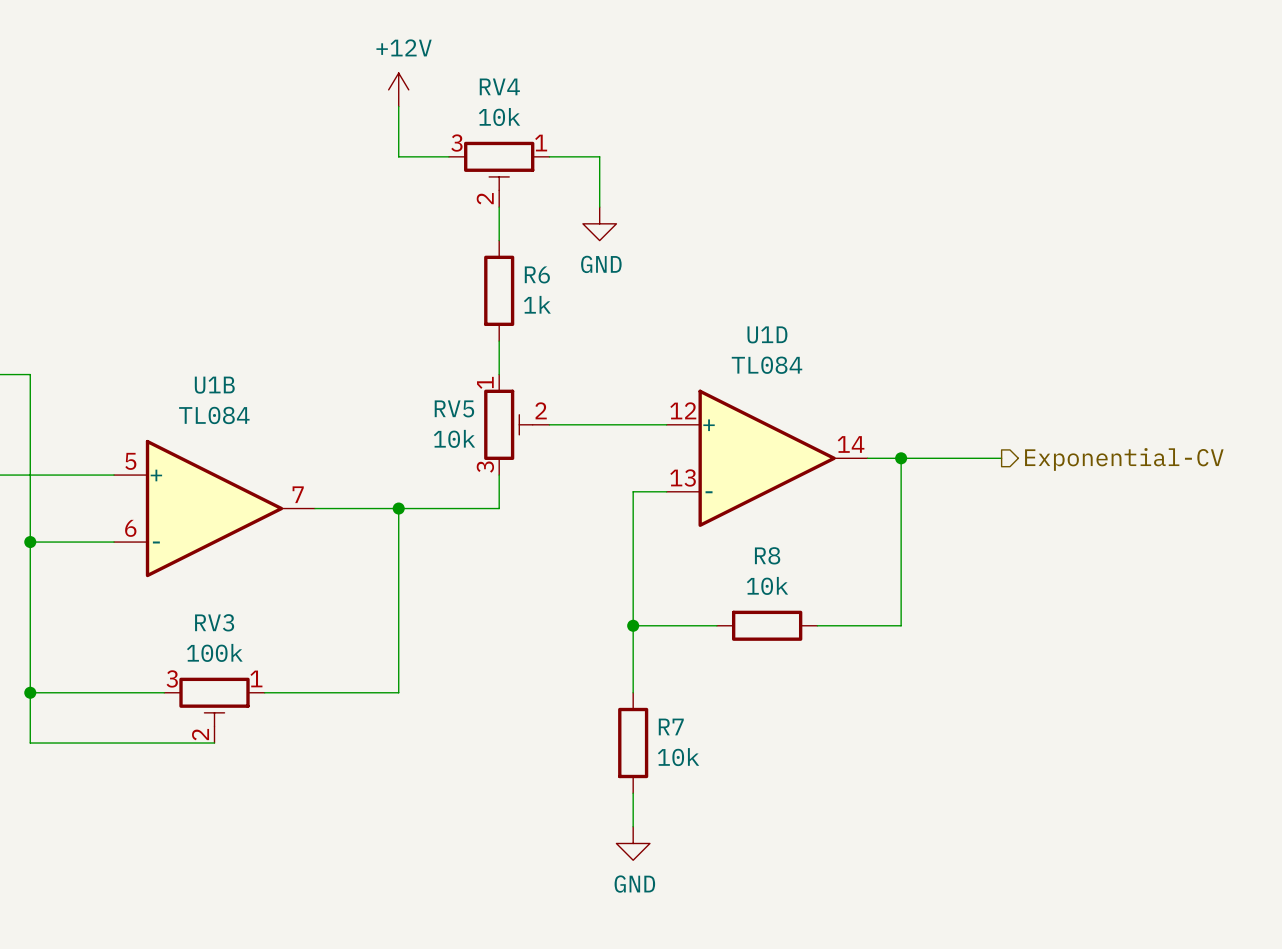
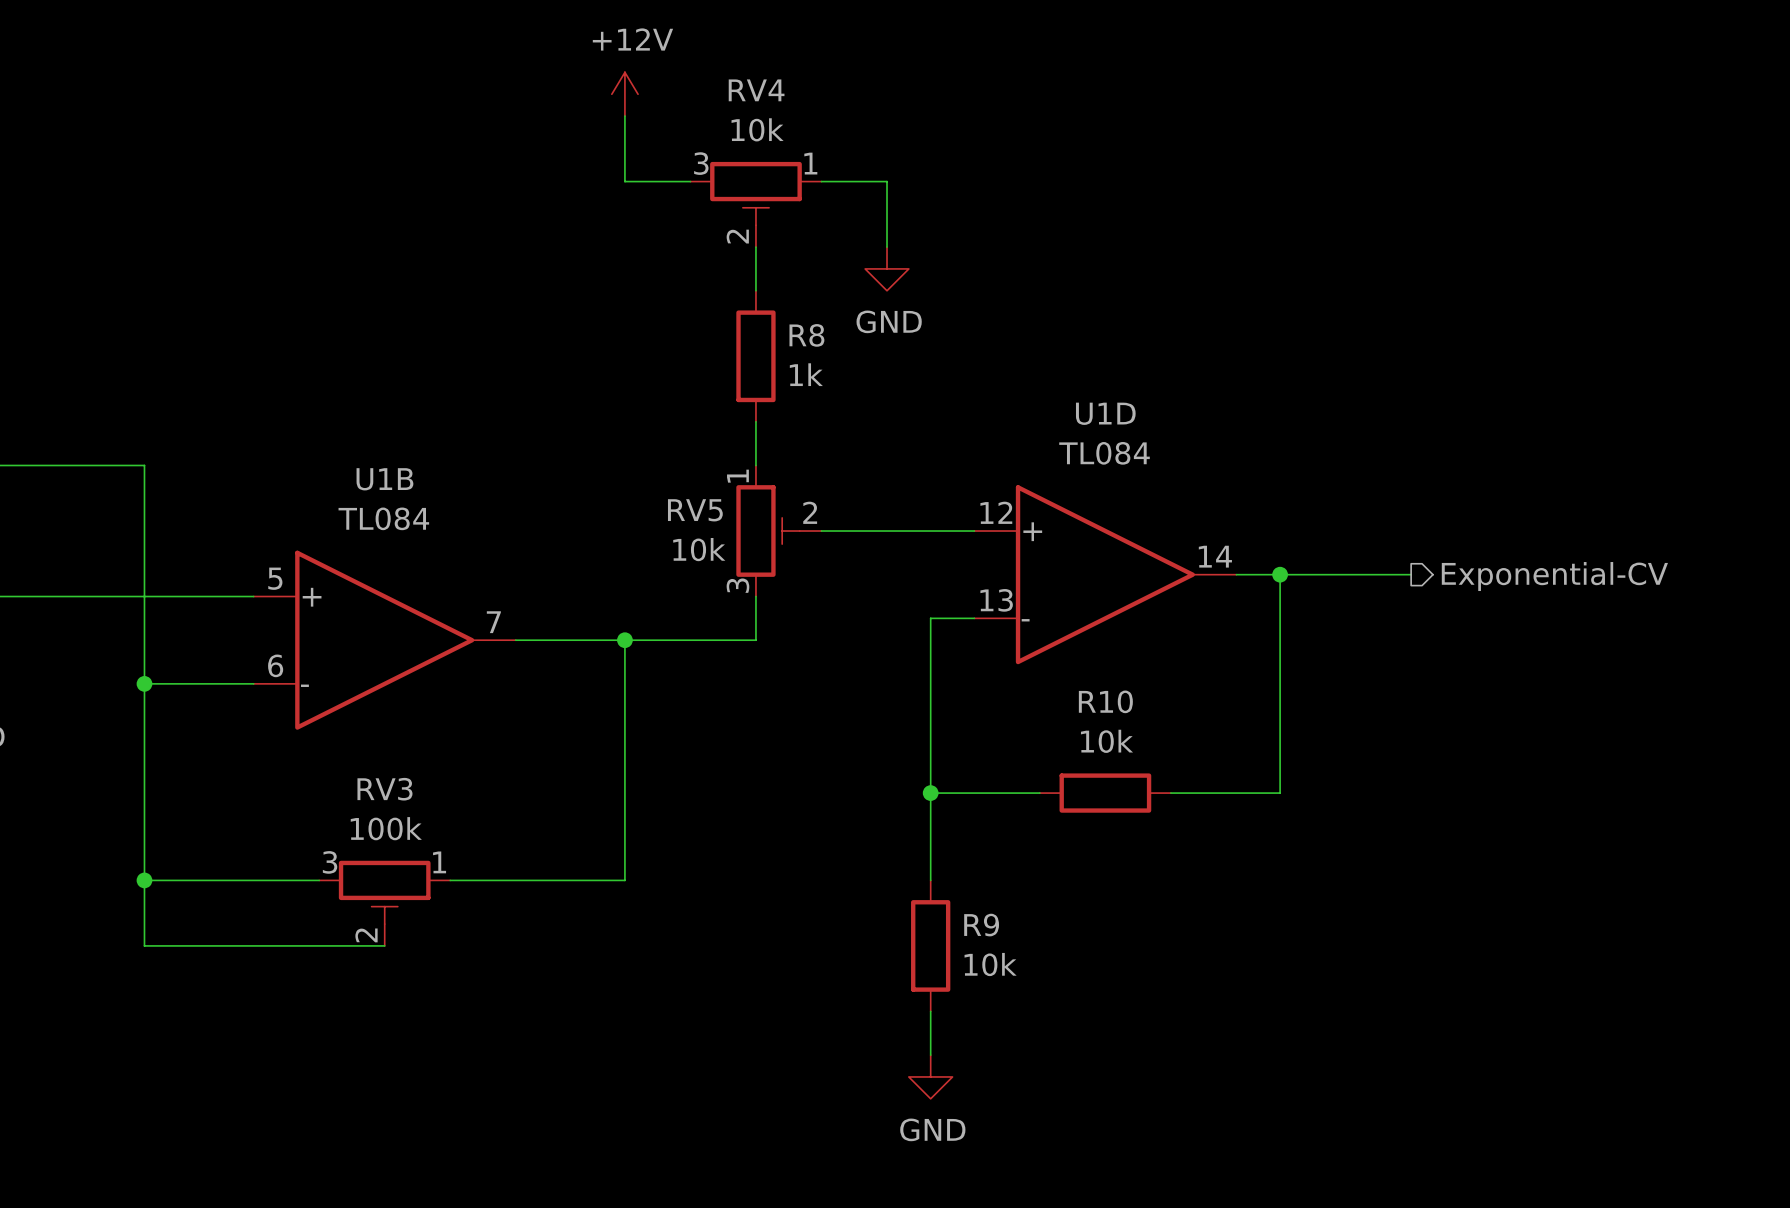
R6 name: R6 (537, 274) -> R8 (806, 335)
R8 name: R8 (767, 555) -> R10 (1105, 701)
R7 name: R7 (671, 726) -> R9 (981, 925)

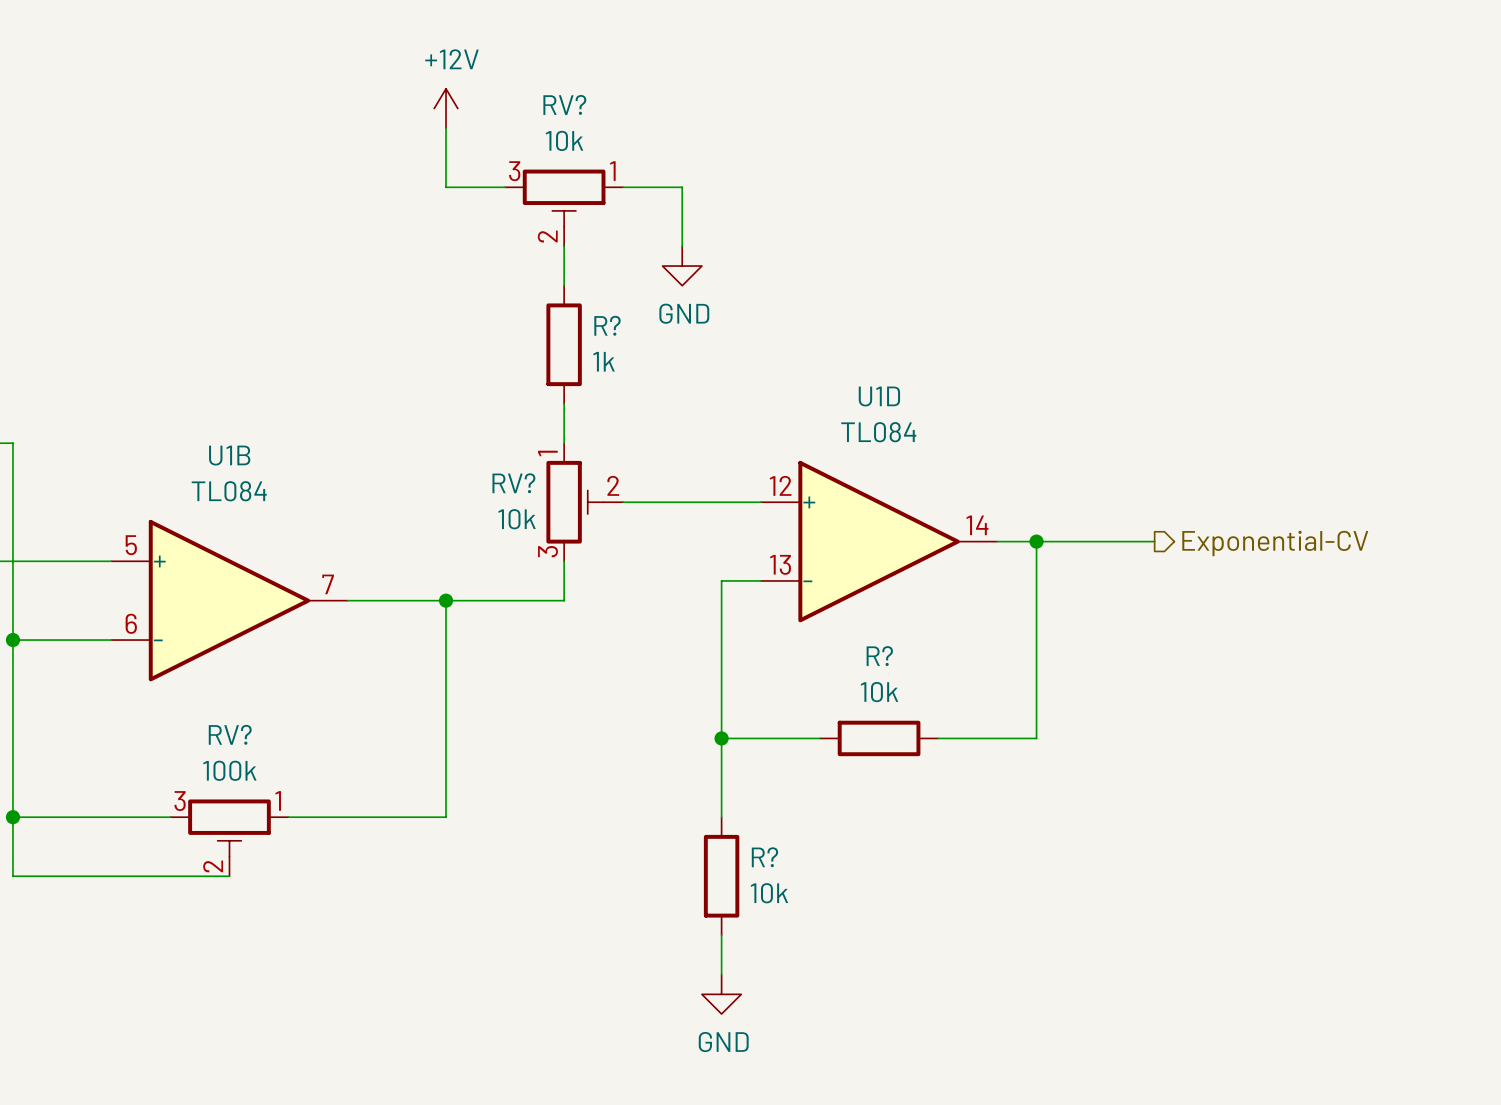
RV4 name: RV4 (756, 90) -> RV? (564, 104)
R8 name: R8 (806, 335) -> R? (607, 325)
RV5 name: RV5 (695, 510) -> RV? (513, 483)
R10 name: R10 (1105, 701) -> R? (879, 656)
RV3 name: RV3 (384, 789) -> RV? (230, 734)
R9 name: R9 (981, 925) -> R? (764, 857)

